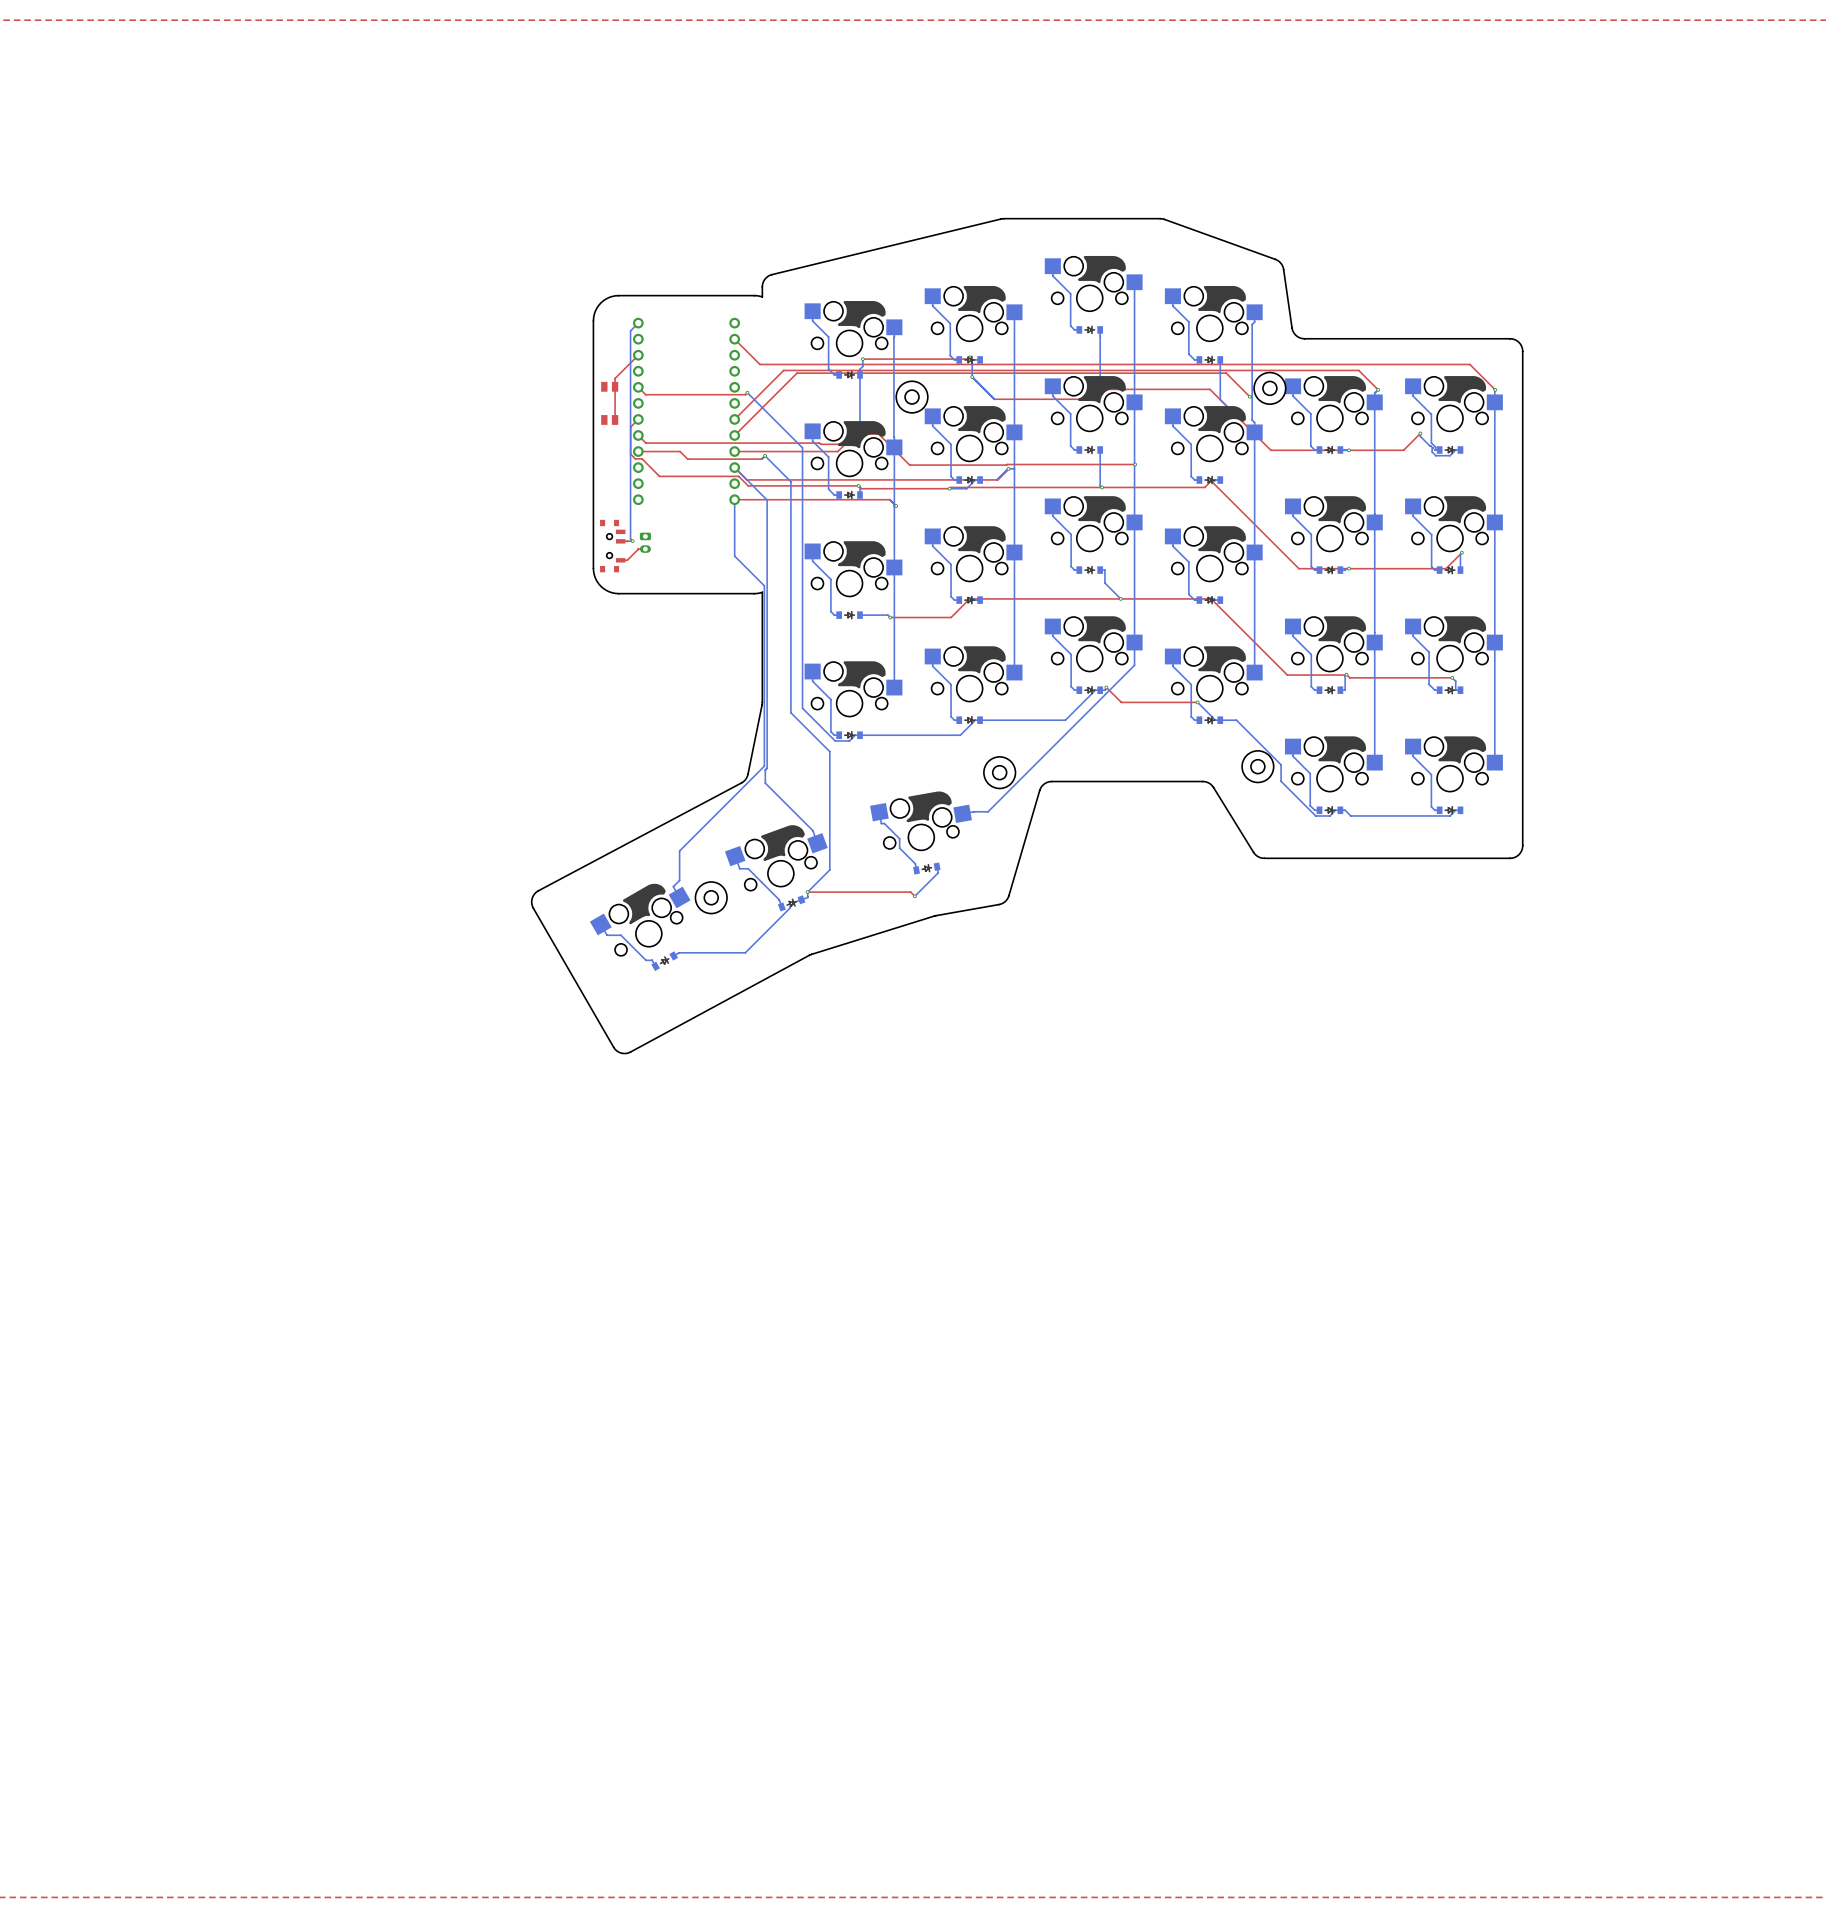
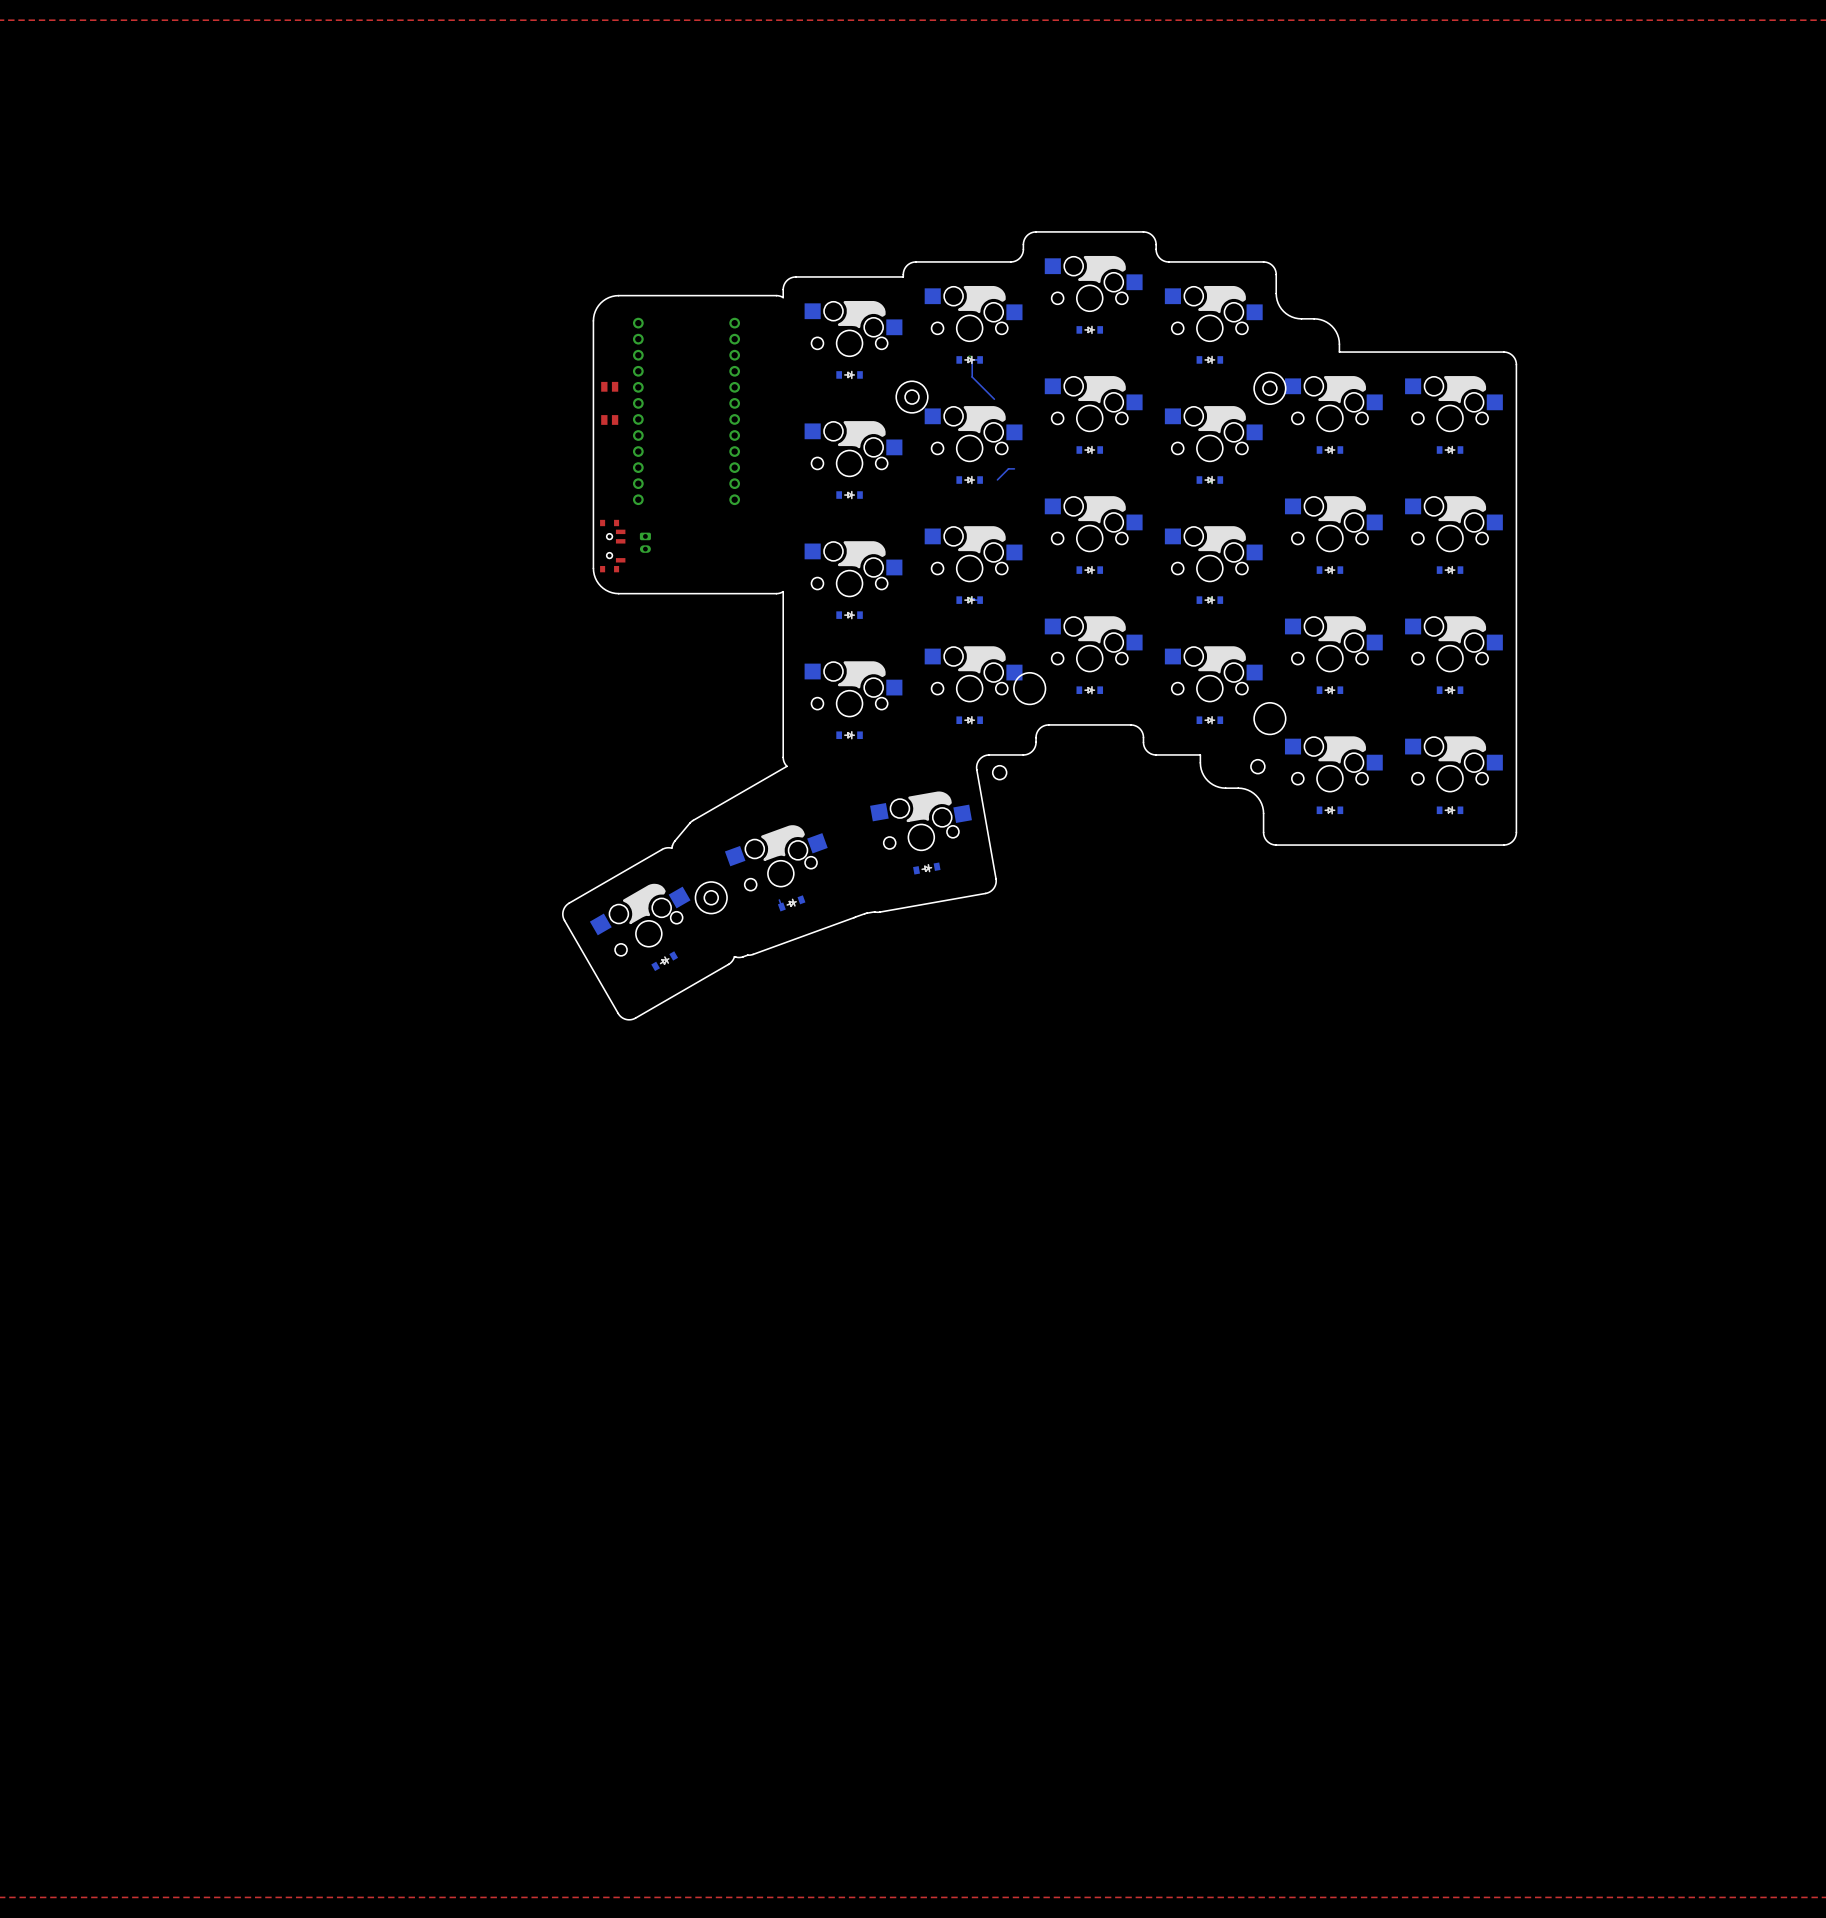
bottom track: (1052, 266) (1052, 276) (1070, 293) (1070, 325) (1074, 329) (1079, 329) -> none
bottom track: (1134, 282) (1134, 665) (988, 811) (962, 813) -> none
board edge: (754, 295) (762, 296) (763, 282) (770, 275) (1001, 219) (1161, 218) (1278, 261) (1283, 269) (1292, 329) (1300, 337) (1510, 338) (1517, 341) (1522, 351) (1522, 849) (1516, 856) (1510, 858) (1262, 858) (1254, 853) (1213, 787) (1207, 782) (1048, 781) (1040, 789) (1008, 895) (1004, 902) (935, 915) (810, 954) (630, 1052) (621, 1053) (613, 1047) (533, 908) (532, 898) (538, 890) (745, 779) (762, 702) (762, 592) (754, 593) -> (754, 295) (777, 295) (783, 297) (784, 284) (787, 279) (794, 277) (903, 276) (906, 266) (914, 262) (1013, 261) (1022, 254) (1026, 236) (1034, 232) (1144, 232) (1153, 236) (1157, 254) (1165, 261) (1263, 261) (1270, 263) (1275, 271) (1276, 296) (1281, 308) (1294, 317) (1317, 319) (1329, 324) (1337, 334) (1339, 352) (1503, 352) (1510, 353) (1515, 359) (1516, 832) (1512, 841) (1503, 845) (1273, 844) (1267, 841) (1264, 836) (1263, 810) (1258, 798) (1244, 789) (1222, 787) (1210, 782) (1202, 772) (1200, 754) (1150, 753) (1144, 746) (1141, 730) (1133, 725) (1047, 725) (1037, 730) (1035, 746) (1028, 753) (986, 755) (980, 758) (977, 763) (995, 878)
bottom track: (932, 296) (932, 306) (950, 323) (950, 355) (954, 359) (959, 359) -> none
bottom track: (1172, 296) (1172, 306) (1188, 321) (1188, 354) (1194, 359) (1199, 359) -> none
bottom track: (812, 311) (812, 321) (828, 336) (828, 369) (834, 374) (839, 374) -> none
bottom track: (1014, 312) (1014, 672) -> none
bottom track: (1254, 312) (1254, 322) (1252, 324) (1252, 420) (1254, 422) (1254, 672) -> none
bottom track: (638, 323) (630, 330) (630, 539) (632, 541) -> none
bottom track: (894, 327) (894, 687) -> none
bottom track: (1100, 329) (1100, 390) -> none
top track: (734, 339) (759, 364) (1469, 364) (1495, 389) -> none
top track: (638, 355) (615, 378) (615, 419) -> none
top track: (969, 357) (967, 359) (862, 359) -> none
bottom track: (862, 359) (862, 366) (860, 369) (859, 427) -> none
via: (862, 359) -> none
bottom track: (1220, 359) (1220, 399) (1233, 412) -> none
top track: (972, 377) (994, 399) (1091, 399) (1101, 389) (1209, 389) (1270, 450) (1403, 450) (1420, 433) -> none
via: (972, 377) -> none
bottom track: (1052, 386) (1052, 396) (1070, 413) (1070, 446) (1074, 450) (1079, 450) -> none
bottom track: (1293, 386) (1293, 396) (1310, 413) (1310, 446) (1314, 450) (1319, 450) -> none
bottom track: (1413, 386) (1413, 396) (1431, 414) (1431, 442) (1435, 447) (1434, 450) (1439, 450) -> none
top track: (638, 387) (645, 394) (745, 394) (747, 392) -> none
top track: (1378, 389) (1358, 370) (783, 370) (734, 419) -> none
bottom track: (1378, 389) (1374, 392) (1374, 762) -> none
via: (1378, 389) -> none
bottom track: (1495, 389) (1494, 762) -> none
via: (1495, 389) -> none
bottom track: (747, 392) (802, 447) (802, 708) (835, 740) (849, 740) (855, 735) (960, 735) (975, 720) (1065, 720) (1095, 690) (1104, 690) (1106, 687) -> none
via: (747, 392) -> none
top track: (1249, 396) (1226, 373) (797, 373) (734, 435) -> none
via: (1249, 396) -> none
bottom track: (932, 416) (932, 426) (951, 444) (951, 476) (954, 480) (959, 480) -> none
bottom track: (1172, 416) (1172, 426) (1191, 444) (1191, 476) (1194, 480) (1199, 480) -> none
top track: (638, 419) (630, 427) (630, 454) (635, 458) (642, 458) (659, 476) (738, 476) (748, 485) (858, 485) (861, 488) (1204, 487) (1211, 480) (1298, 568) (1445, 568) (1461, 552) -> none
top track: (859, 427) (841, 444) (645, 443) (638, 435) -> none
bottom track: (812, 431) (812, 441) (828, 457) (828, 489) (834, 495) (839, 495) -> none
bottom track: (1420, 433) (1420, 436) (1433, 448) (1432, 452) (1435, 455) (1450, 455) (1455, 450) (1460, 450) -> none
via: (1420, 433) -> none
bottom track: (1100, 450) (1100, 485) (1102, 487) -> none
bottom track: (1340, 450) (1349, 450) -> none
via: (1349, 450) -> none
top track: (638, 451) (680, 451) (687, 459) (761, 459) (765, 455) -> none
top track: (734, 451) (837, 451) (855, 434) (878, 434) (909, 465) (1135, 464) -> none
via: (765, 455) -> none
bottom track: (761, 459) (765, 455) (790, 481) (790, 712) (829, 751) (829, 869) (807, 892) (807, 897) (795, 902) (745, 952) (679, 952) (673, 955) -> none
via: (1135, 464) -> none
top track: (734, 467) (746, 479) (997, 479) (1008, 468) -> none
bottom track: (734, 467) (767, 500) (767, 768) (765, 770) (765, 783) (812, 830) (817, 843) -> none
via: (1008, 468) -> none
bottom track: (980, 480) (975, 480) (966, 488) (949, 488) -> none
bottom track: (1220, 480) (1211, 480) -> none
bottom track: (858, 485) (860, 495) -> none
via: (858, 485) -> none
via: (1102, 487) -> none
via: (949, 488) -> none
top track: (734, 499) (889, 499) (896, 506) -> none
bottom track: (734, 499) (734, 556) (764, 585) (764, 766) (679, 850) (679, 880) (673, 886) (679, 897) -> none
bottom track: (889, 499) (896, 506) (894, 506) -> none
via: (896, 506) -> none
bottom track: (1052, 506) (1052, 516) (1071, 534) (1071, 566) (1074, 570) (1079, 570) -> none
bottom track: (1293, 506) (1293, 516) (1311, 534) (1311, 566) (1314, 570) (1319, 570) -> none
bottom track: (1413, 506) (1413, 516) (1431, 534) (1431, 566) (1434, 570) (1439, 570) -> none
bottom track: (932, 536) (932, 546) (951, 564) (951, 596) (954, 600) (959, 600) -> none
bottom track: (1172, 536) (1172, 546) (1188, 562) (1188, 594) (1194, 600) (1199, 600) -> none
top track: (632, 541) (620, 541) -> none
via: (632, 541) -> none
top track: (645, 549) (637, 549) (627, 560) (620, 560) -> none
bottom track: (812, 551) (812, 561) (830, 579) (830, 611) (834, 615) (839, 615) -> none
bottom track: (1461, 552) (1460, 570) -> none
via: (1461, 552) -> none
bottom track: (1349, 568) (1340, 570) -> none
via: (1349, 568) -> none
bottom track: (1100, 570) (1104, 570) (1104, 583) (1120, 598) -> none
board edge: none -> (754, 593) (777, 593) (783, 591) (783, 757) (786, 766) (692, 821) (674, 840) (671, 848) (662, 849) (569, 903) (563, 910) (564, 920) (619, 1015) (627, 1019) (635, 1018) (728, 964) (734, 956) (753, 954) (865, 913) (987, 893) (993, 888) (996, 878)
via: (1120, 598) -> none
bottom track: (1211, 598) (1220, 600) -> none
bottom track: (860, 615) (887, 615) (890, 617) -> none
top track: (890, 617) (951, 617) (969, 598) (1211, 598) (1287, 675) (1346, 674) (1349, 677) (1452, 677) -> none
via: (890, 617) -> none
bottom track: (1052, 626) (1052, 636) (1071, 654) (1071, 686) (1074, 690) (1079, 690) -> none
bottom track: (1293, 626) (1293, 636) (1311, 654) (1311, 686) (1314, 690) (1319, 690) -> none
bottom track: (1413, 626) (1413, 636) (1429, 652) (1429, 684) (1434, 690) (1439, 690) -> none
bottom track: (932, 656) (932, 666) (951, 684) (951, 716) (954, 720) (959, 720) -> none
bottom track: (1172, 656) (1172, 666) (1191, 684) (1191, 716) (1194, 720) (1199, 720) -> none
bottom track: (812, 671) (812, 681) (830, 699) (830, 731) (834, 735) (839, 735) -> none
bottom track: (1346, 674) (1345, 690) (1340, 690) -> none
via: (1346, 674) -> none
bottom track: (1452, 677) (1455, 681) (1455, 690) (1460, 690) -> none
via: (1452, 677) -> none
top track: (1106, 687) (1121, 702) (1197, 702) -> none
via: (1106, 687) -> none
bottom track: (1197, 702) (1215, 720) (1236, 720) (1281, 764) (1281, 781) (1315, 815) (1329, 815) (1335, 810) (1345, 810) (1350, 815) (1450, 815) (1455, 810) (1460, 810) -> none
via: (1197, 702) -> none
bottom track: (1293, 746) (1293, 756) (1310, 773) (1310, 805) (1314, 810) (1319, 810) -> none
bottom track: (1413, 746) (1413, 756) (1431, 774) (1431, 806) (1434, 810) (1439, 810) -> none
round board edge position: (1257, 766) -> (1269, 718)
round board edge position: (999, 772) -> (1029, 688)
bottom track: (879, 812) (881, 823) (884, 823) (899, 838) (899, 848) (915, 863) (916, 870) -> none
bottom track: (735, 856) (739, 868) (748, 868) (761, 882) -> none
bottom track: (937, 866) (938, 873) (914, 896) -> none
bottom track: (761, 882) (779, 899) -> none
top track: (807, 892) (910, 892) (914, 896) -> none
via: (807, 892) -> none
via: (914, 896) -> none
bottom track: (600, 924) (607, 935) (620, 935) (646, 960) (652, 960) (655, 966) -> none

